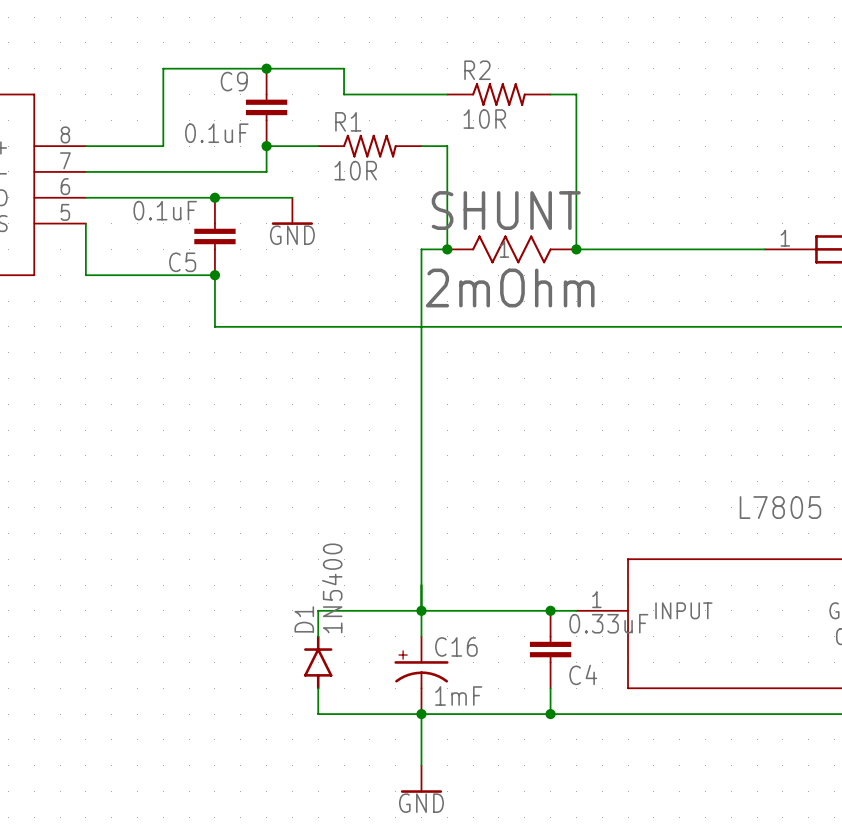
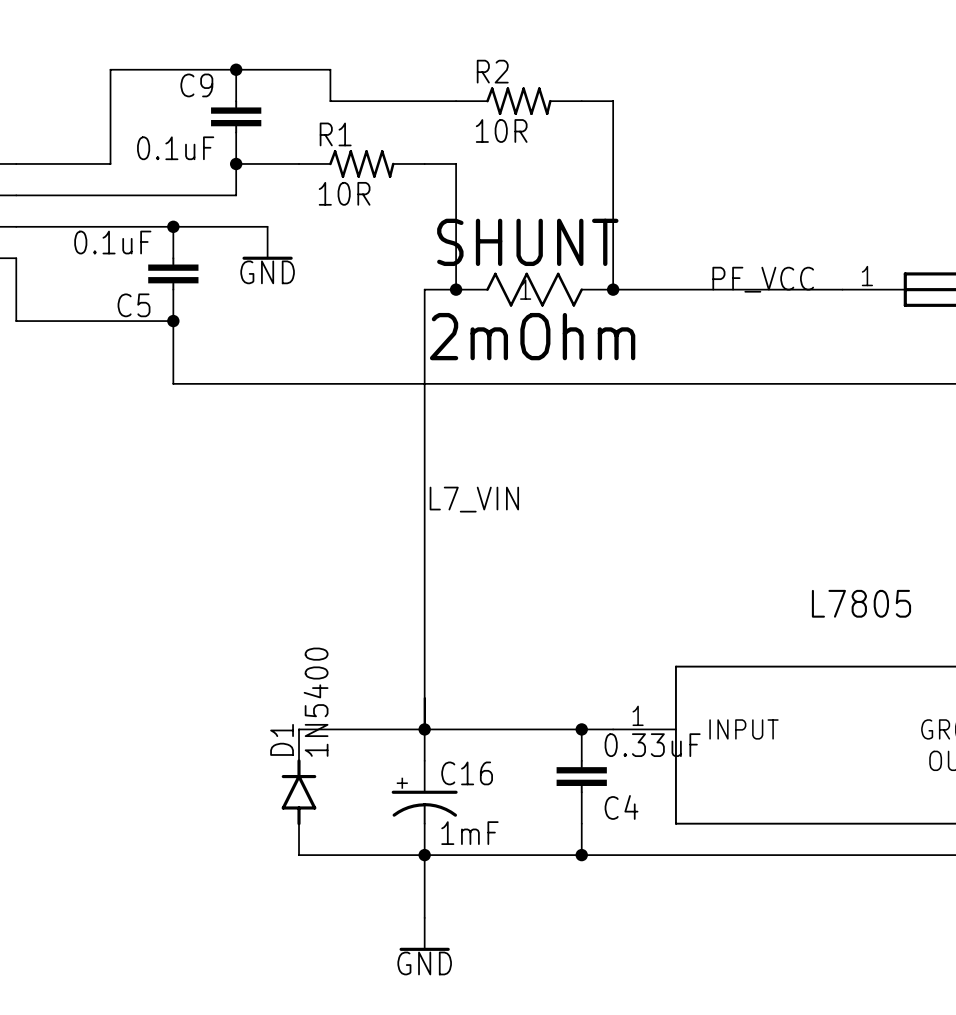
label: none -> PF_VCC (763, 279)
label: none -> L7_VIN (474, 499)

